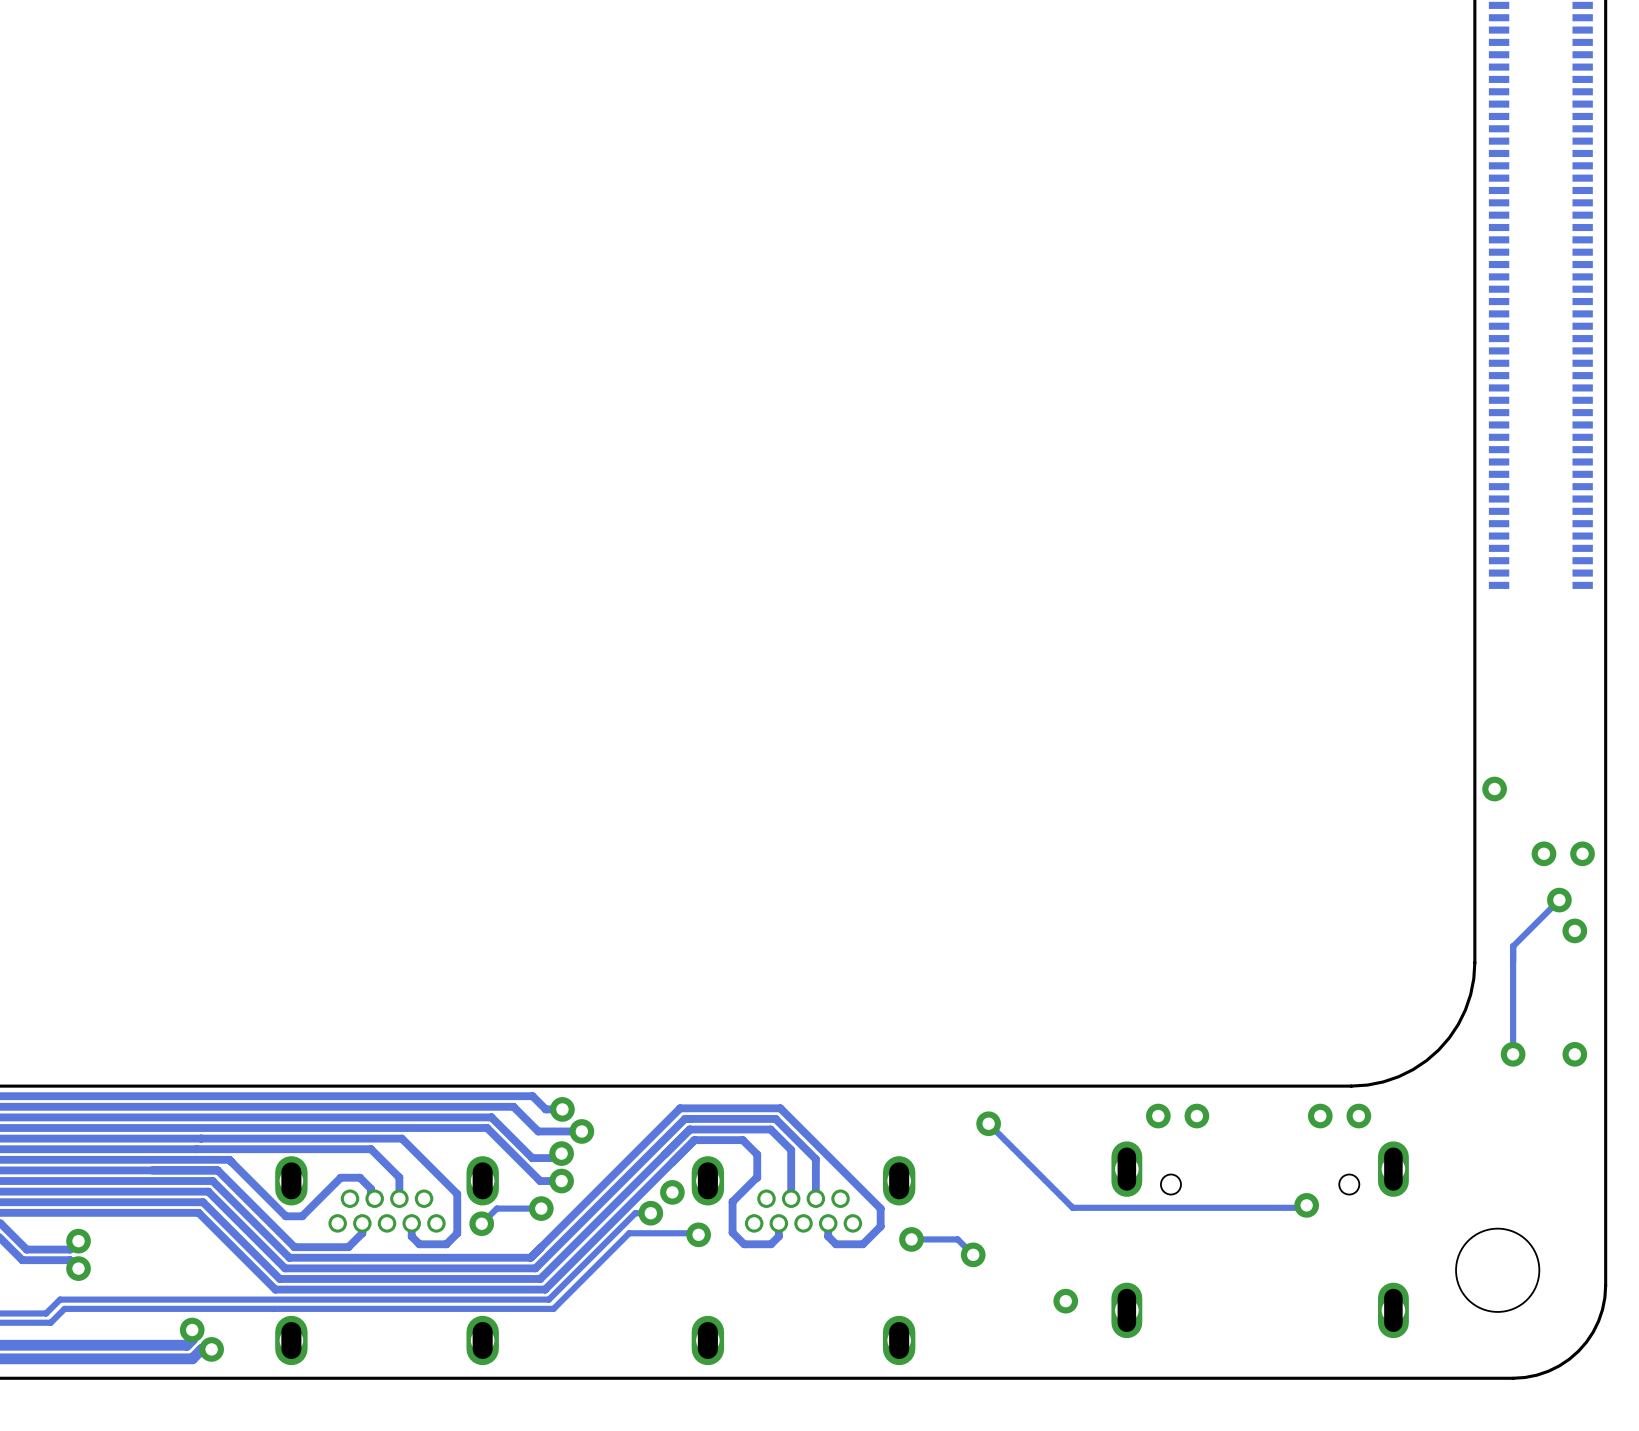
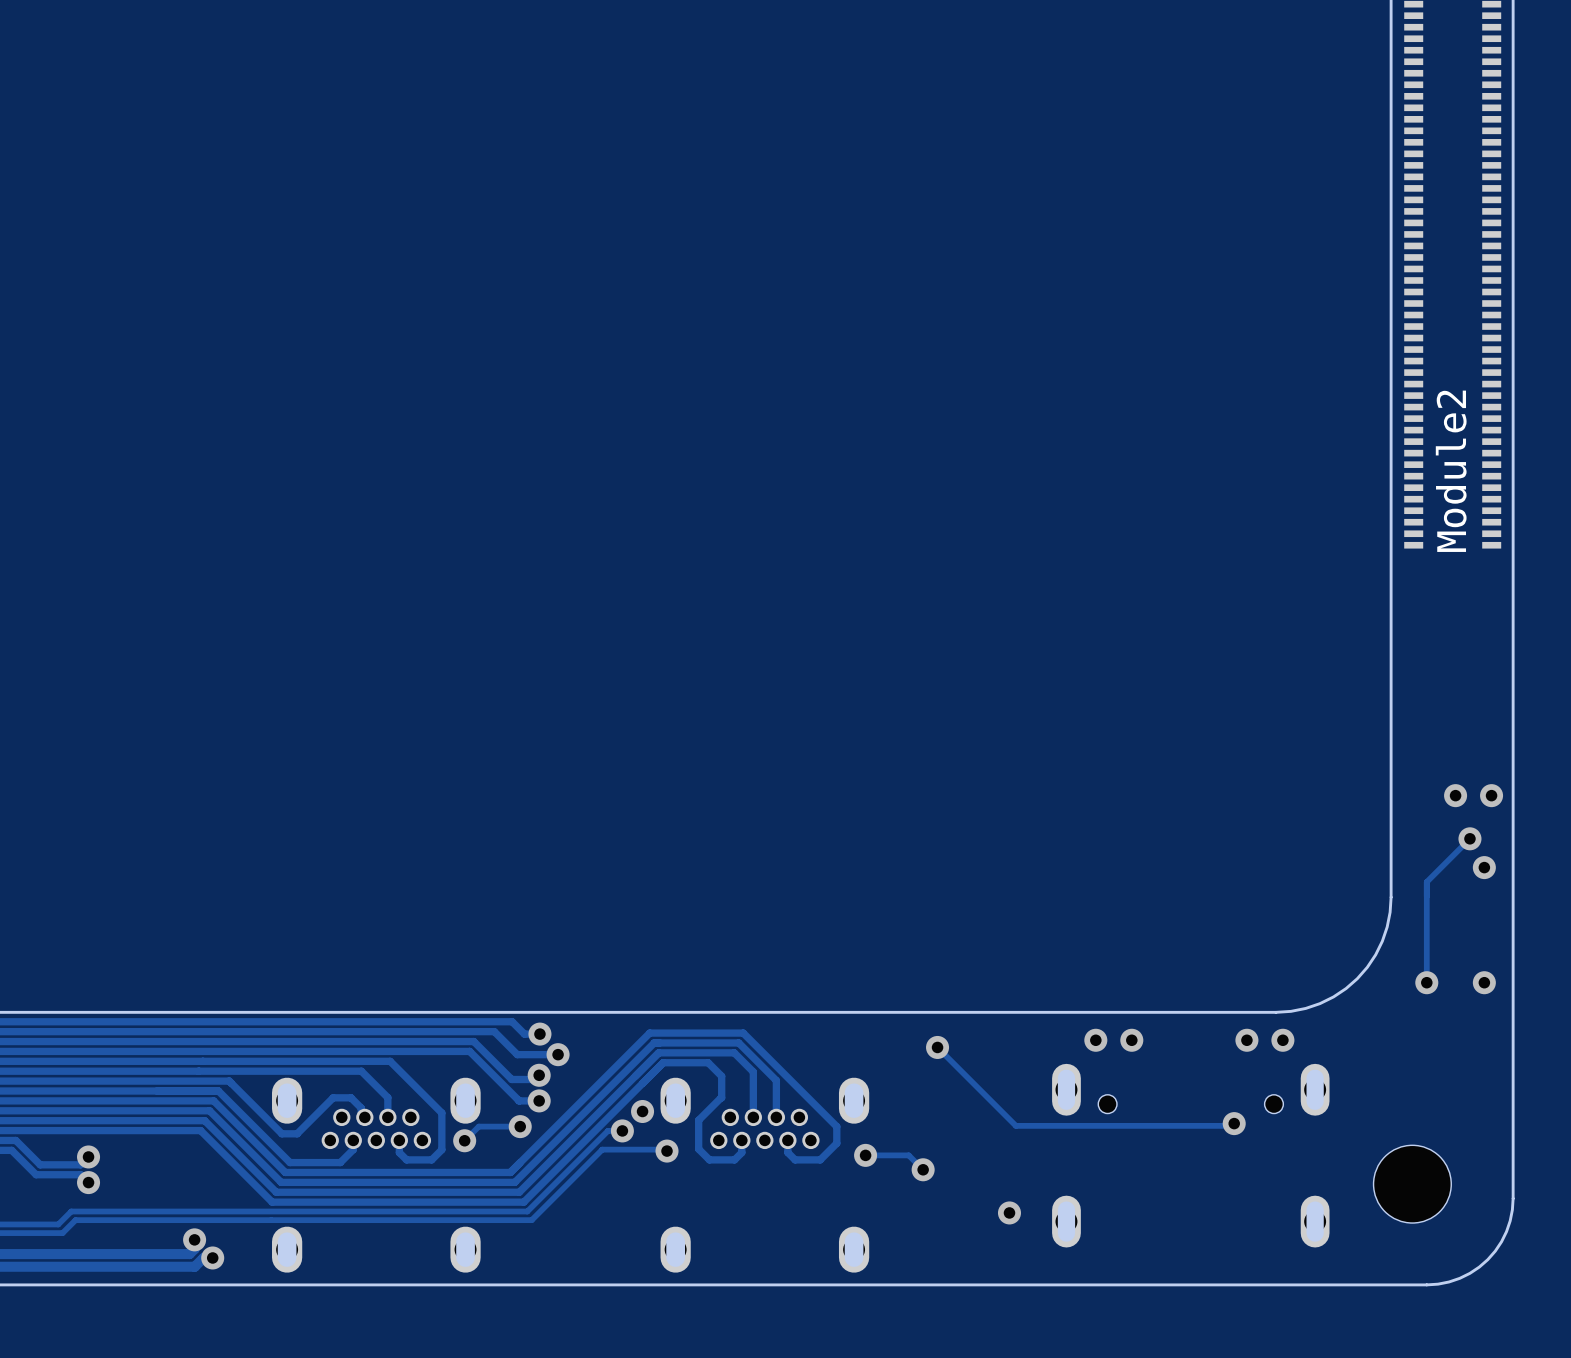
Module2 name: none -> Module2 (1451, 471)
via: (1494, 789) -> none

